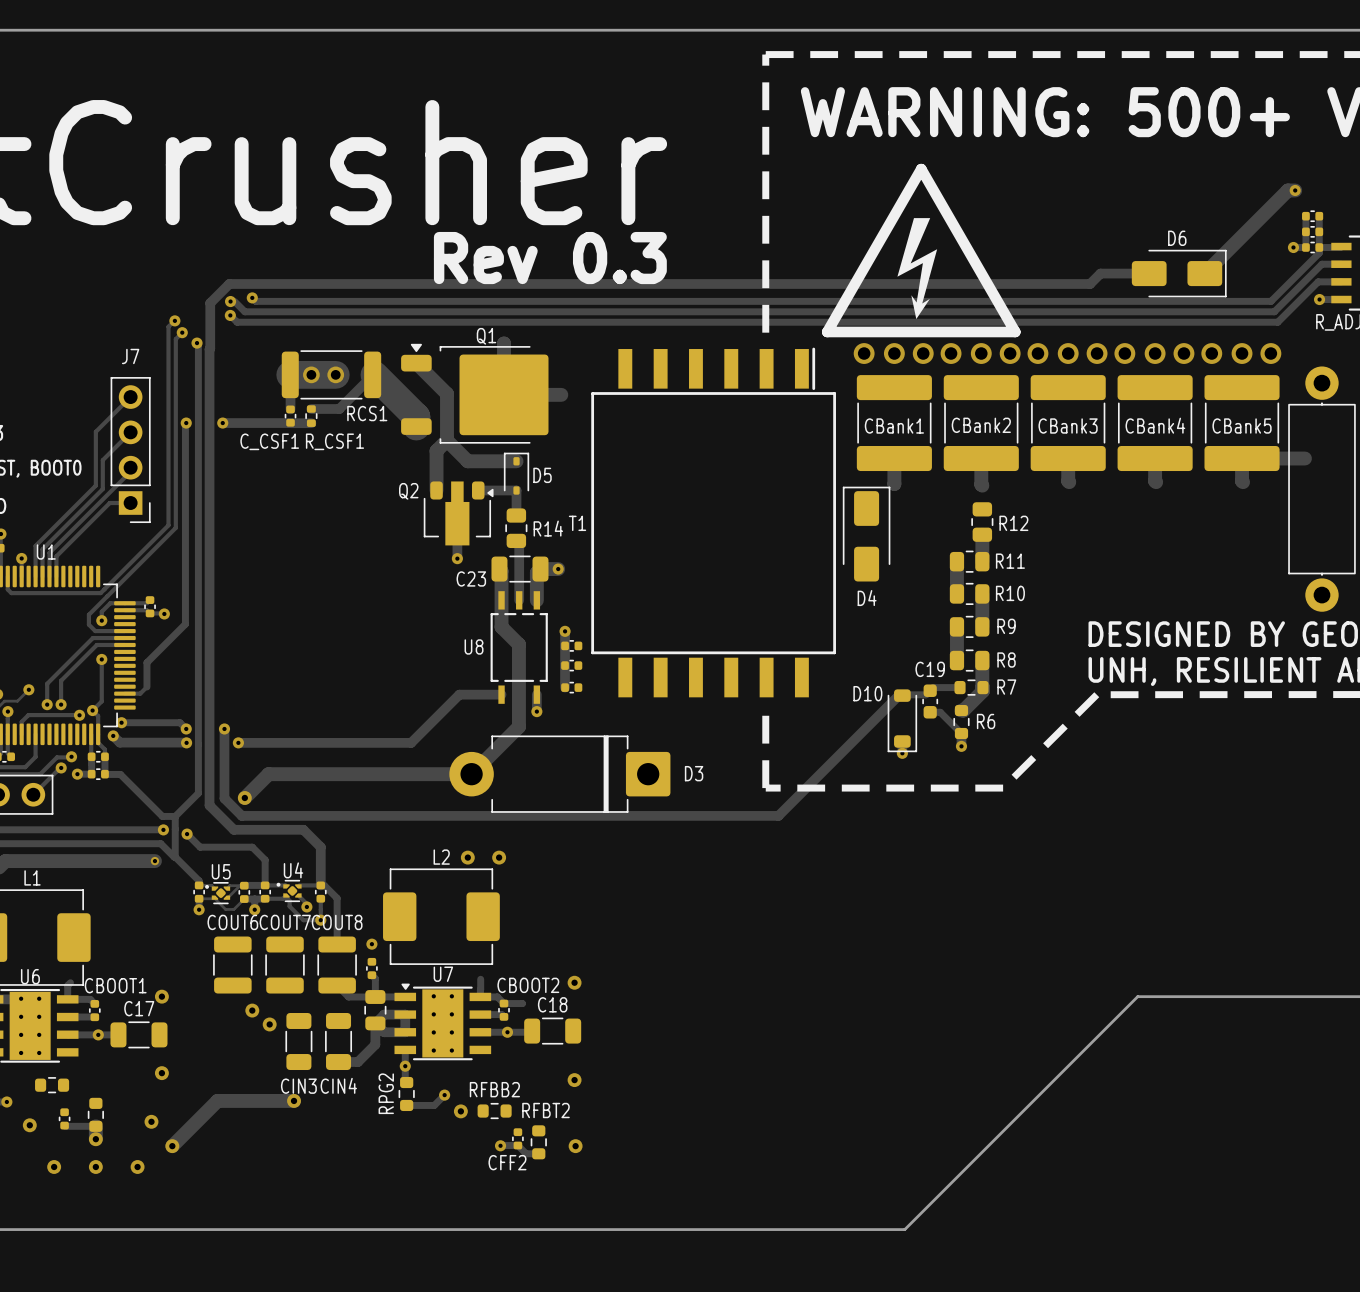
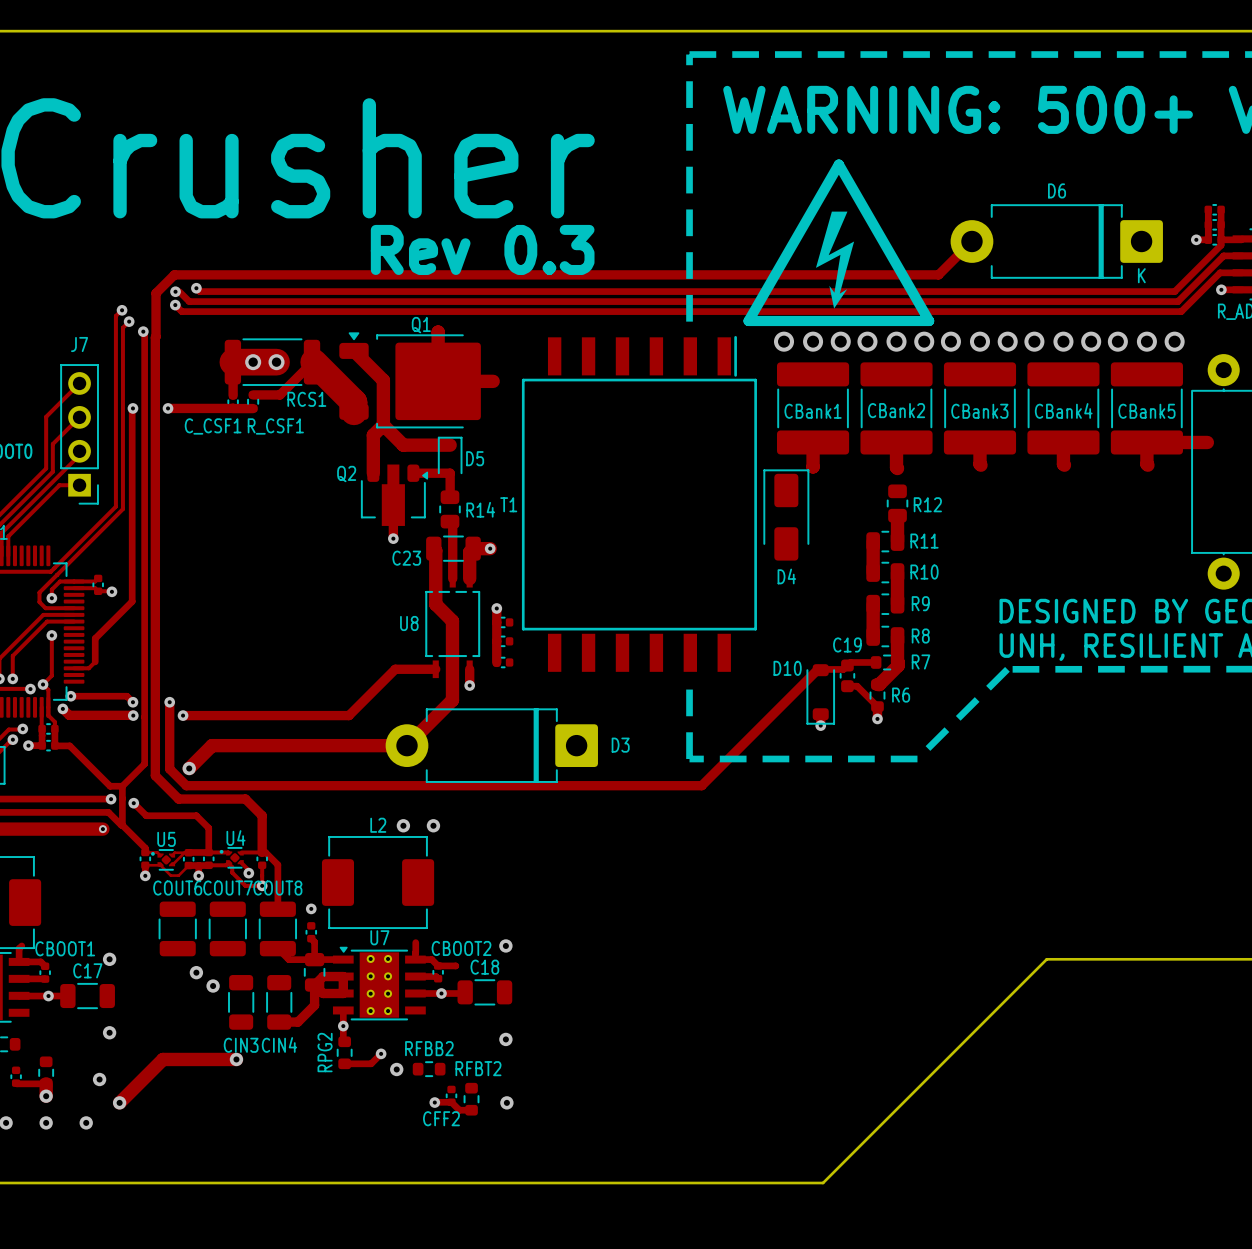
track: (1295, 190) (1287, 190) (1204, 273) -> none
via: (1295, 190) -> none
D6 footprint: [1131, 249, 1227, 298] -> [950, 204, 1163, 279]
track: (1149, 273) (1100, 273) (1090, 283) (1025, 283) -> (971, 241) (938, 274)

